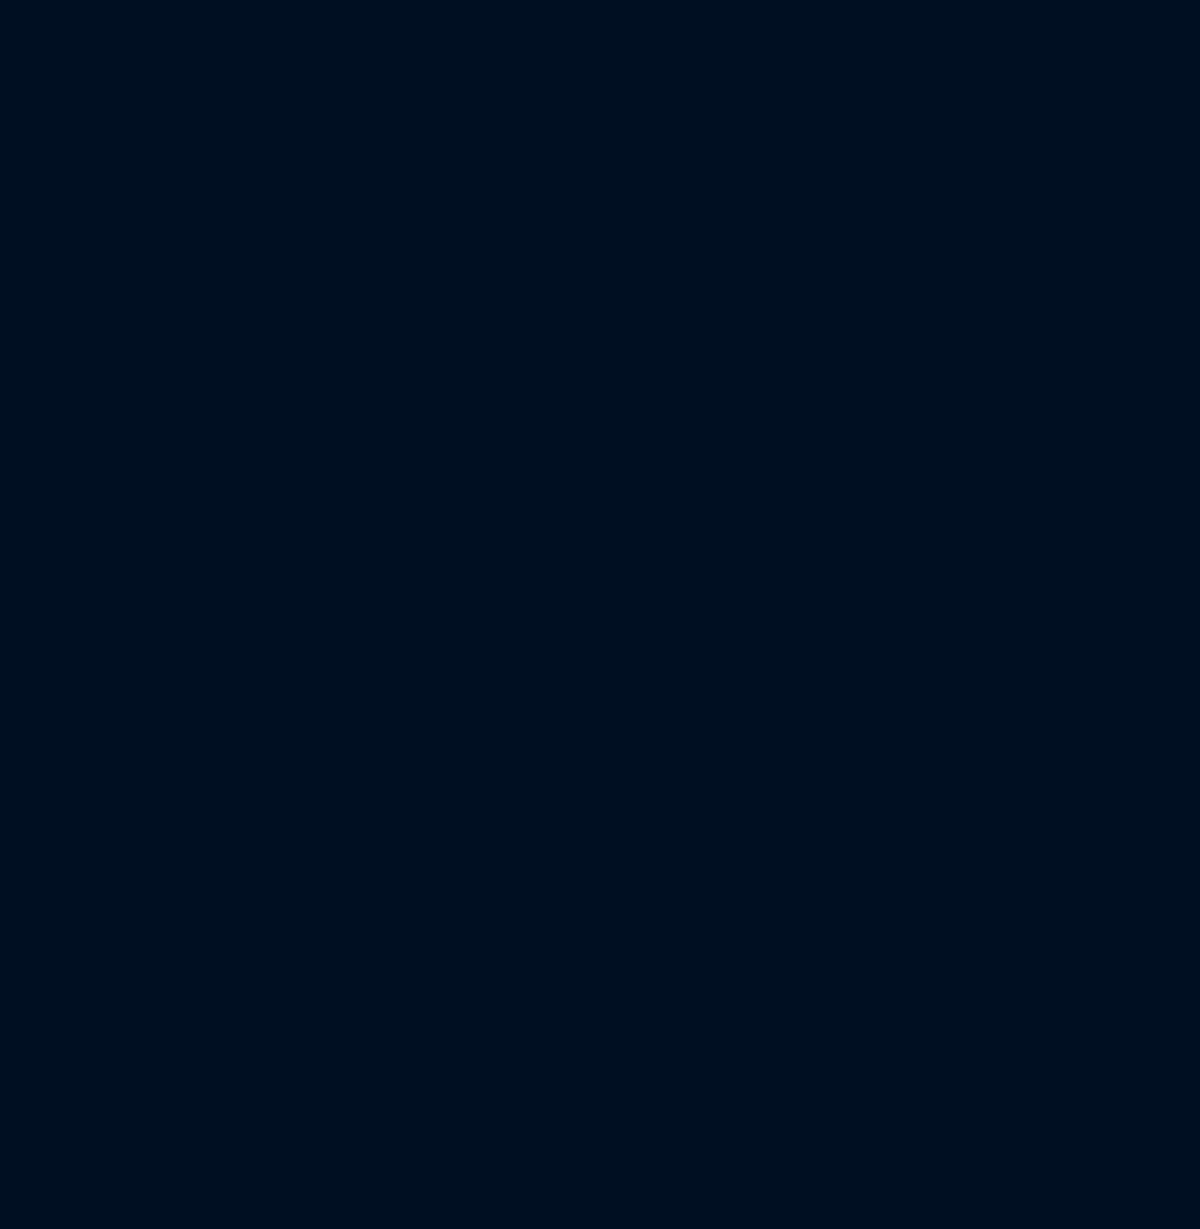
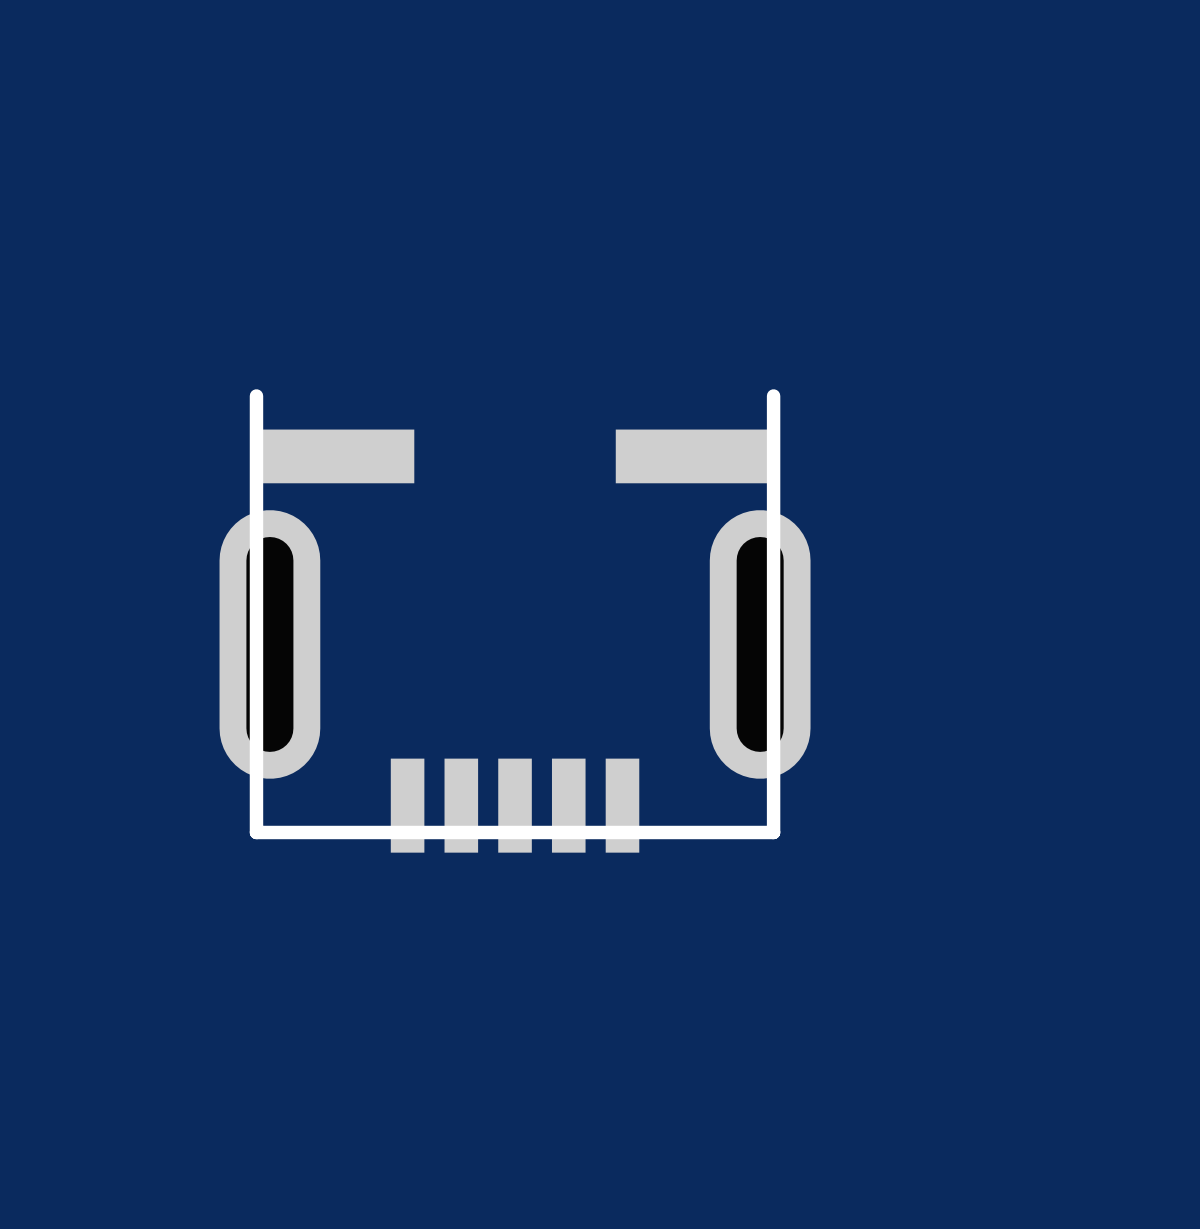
part: none -> (515, 620)

